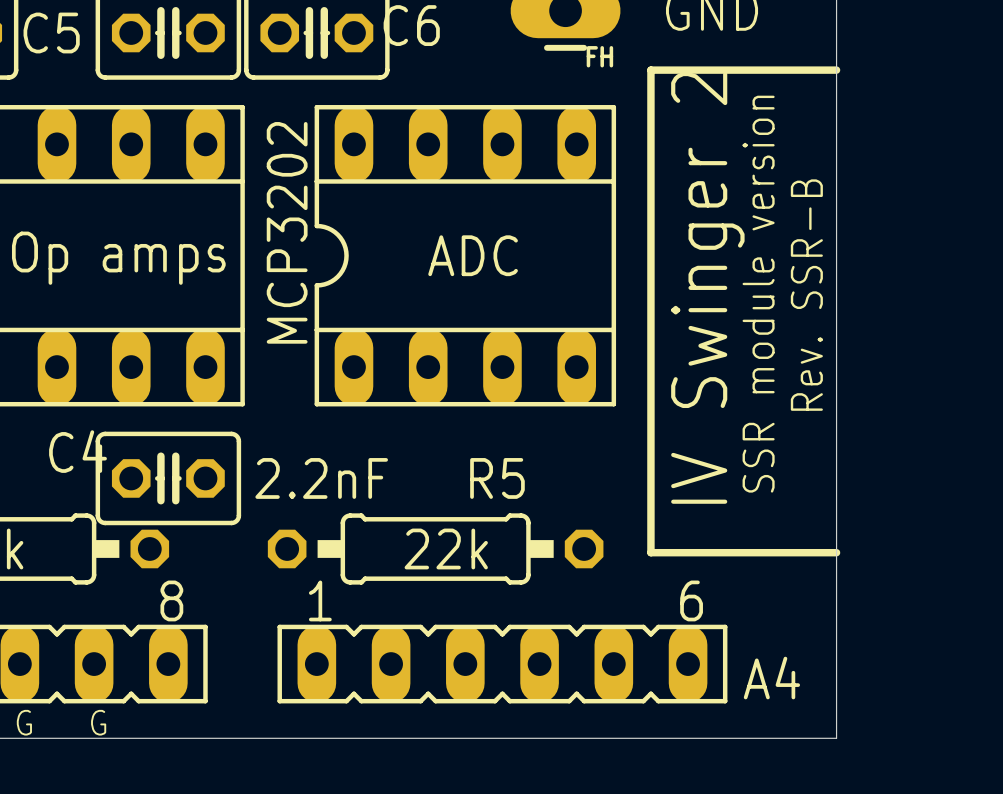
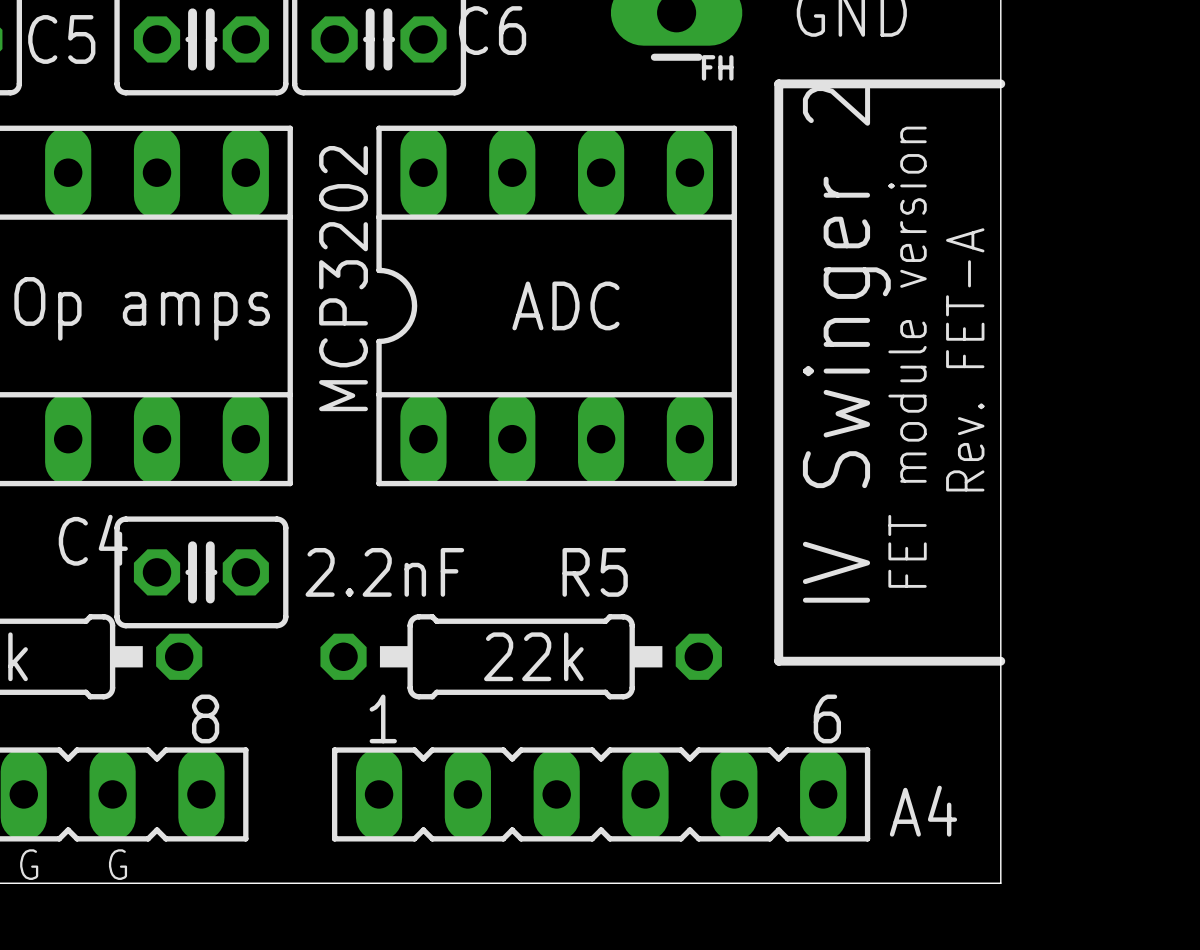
text: SSR module version (758, 294) -> FET module version (907, 357)
text: Rev. SSR-B (806, 295) -> Rev. FET-A (965, 359)

